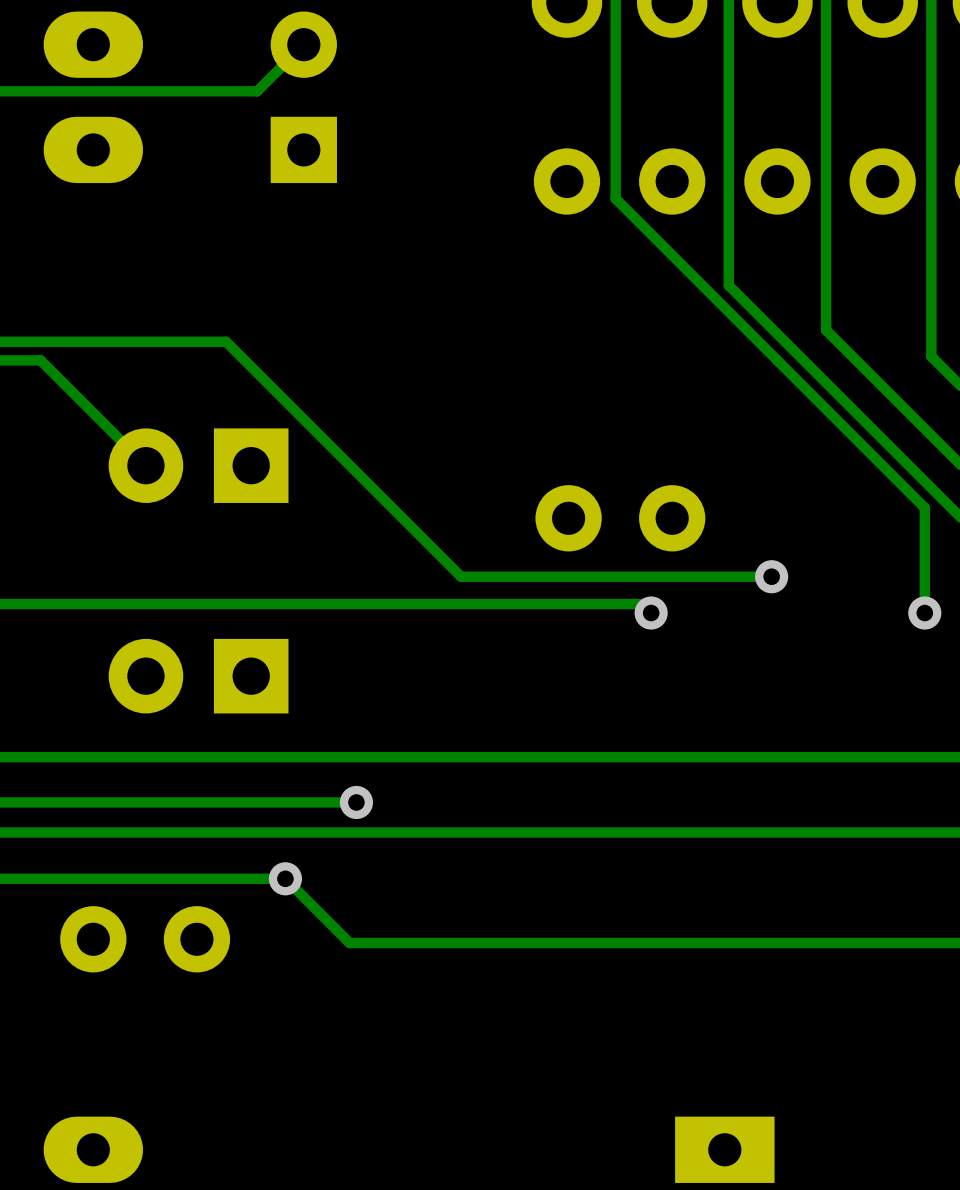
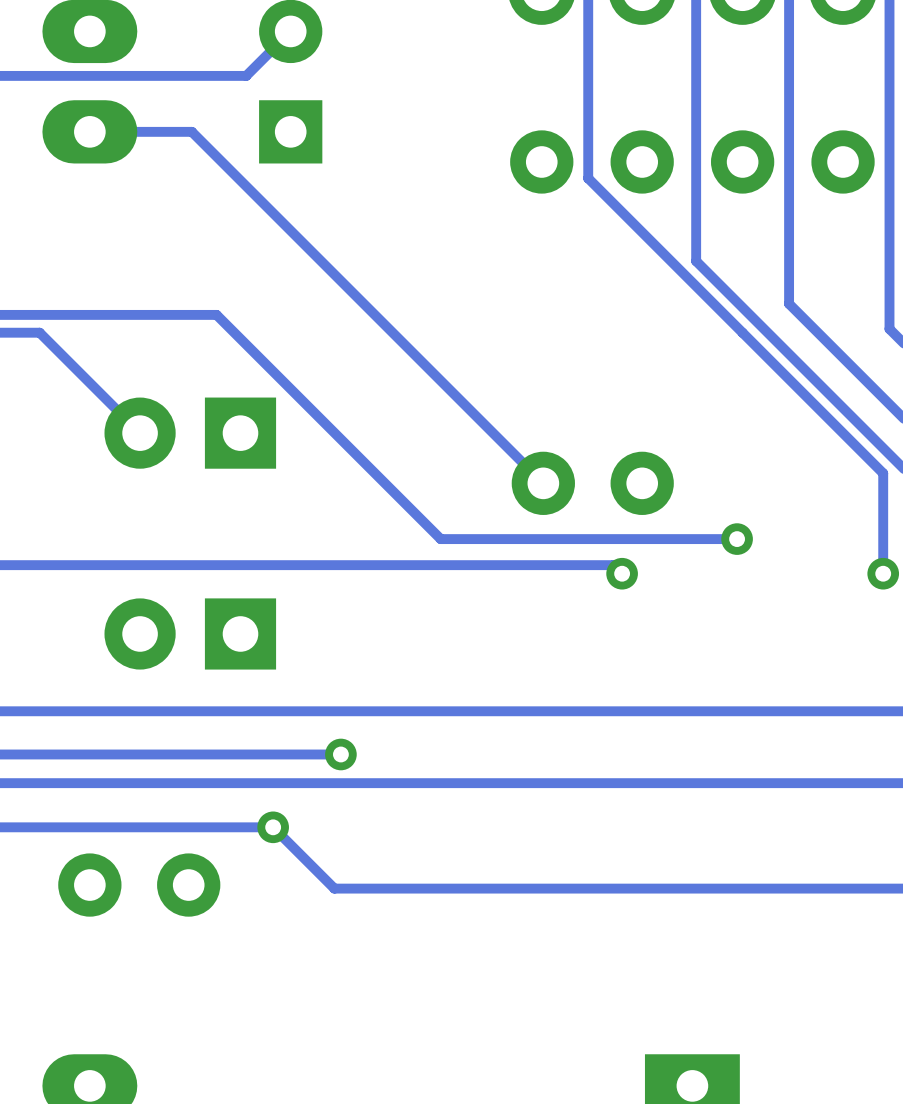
track: none -> (89, 131) (191, 131) (543, 483)

